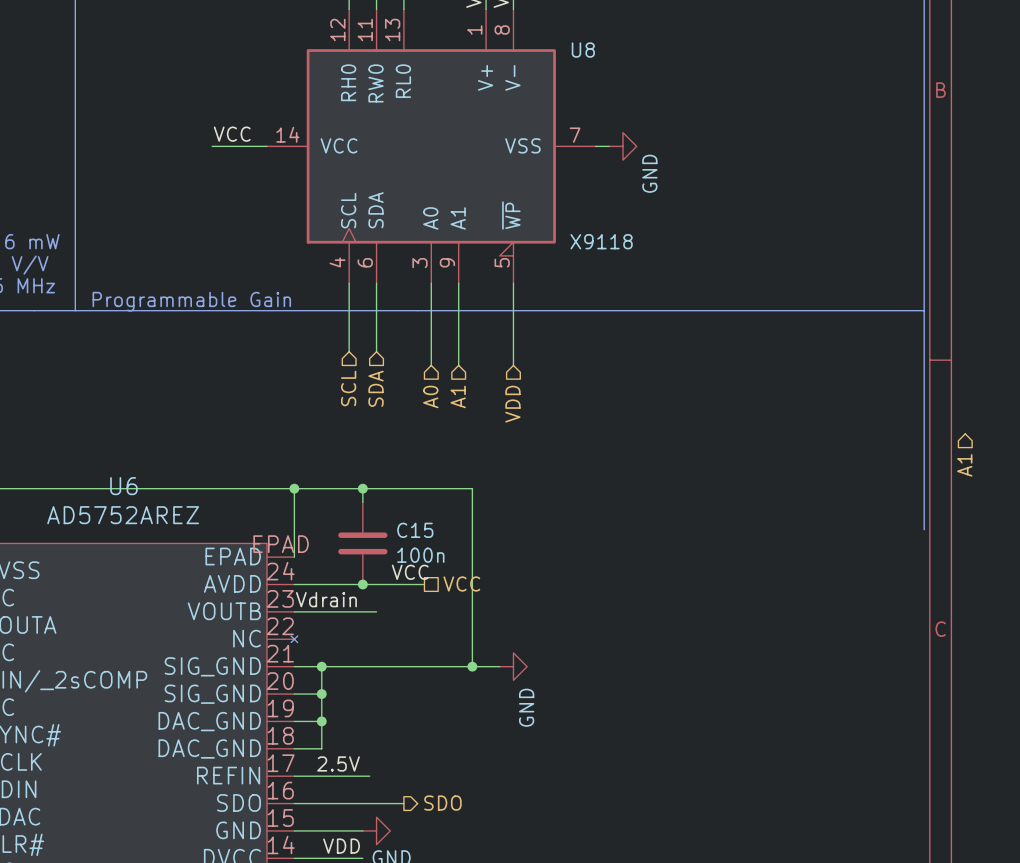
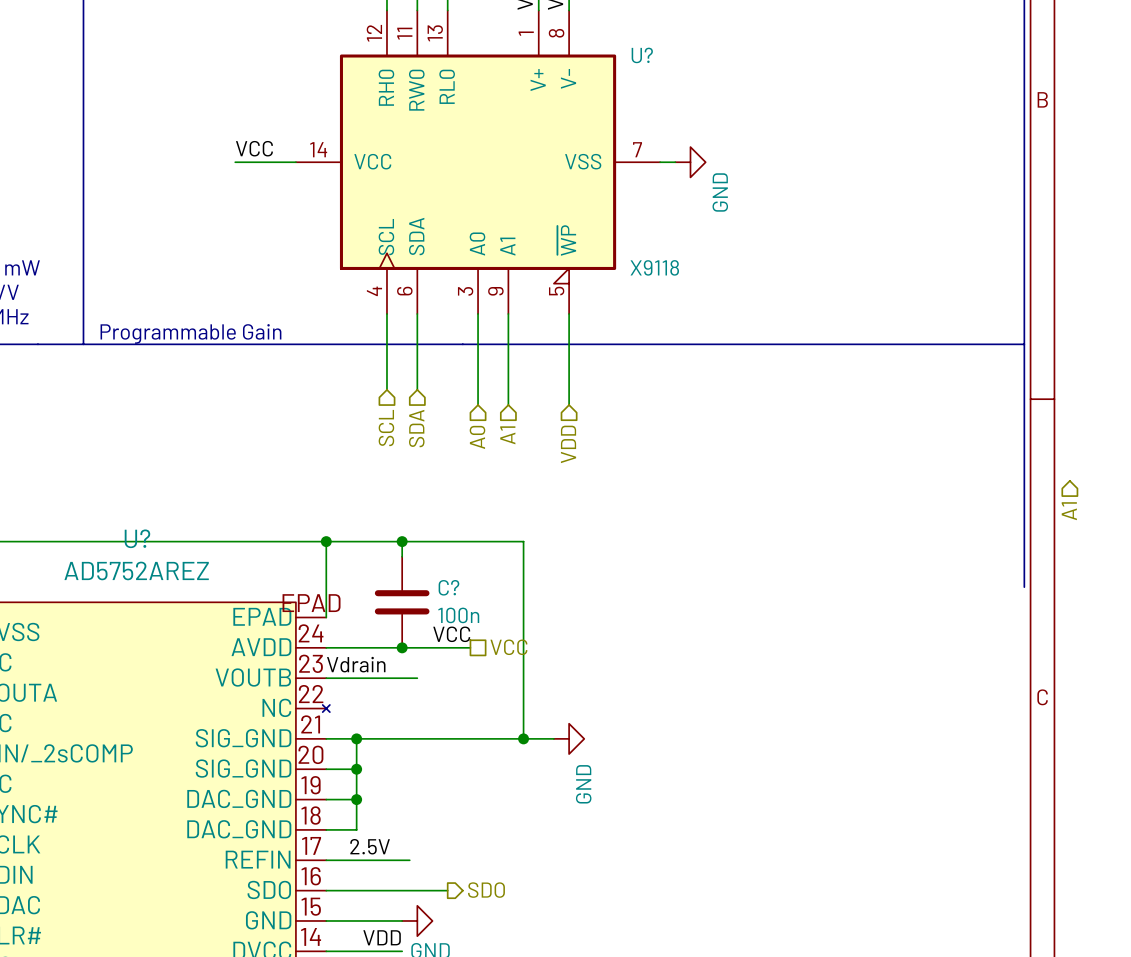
U8 name: U8 (583, 50) -> U? (642, 55)
U6 name: U6 (123, 486) -> U? (137, 538)
C15 name: C15 (415, 530) -> C? (448, 587)

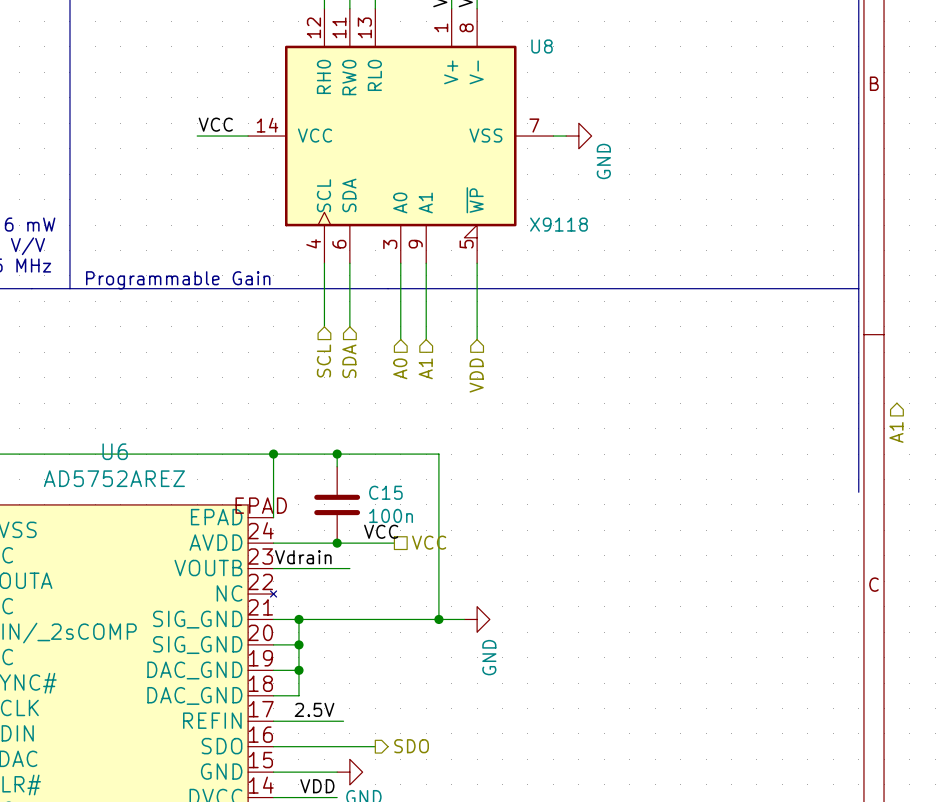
U? name: U? (642, 55) -> U8 (542, 46)
U? name: U? (137, 538) -> U6 (115, 451)
C? name: C? (448, 587) -> C15 (385, 492)

